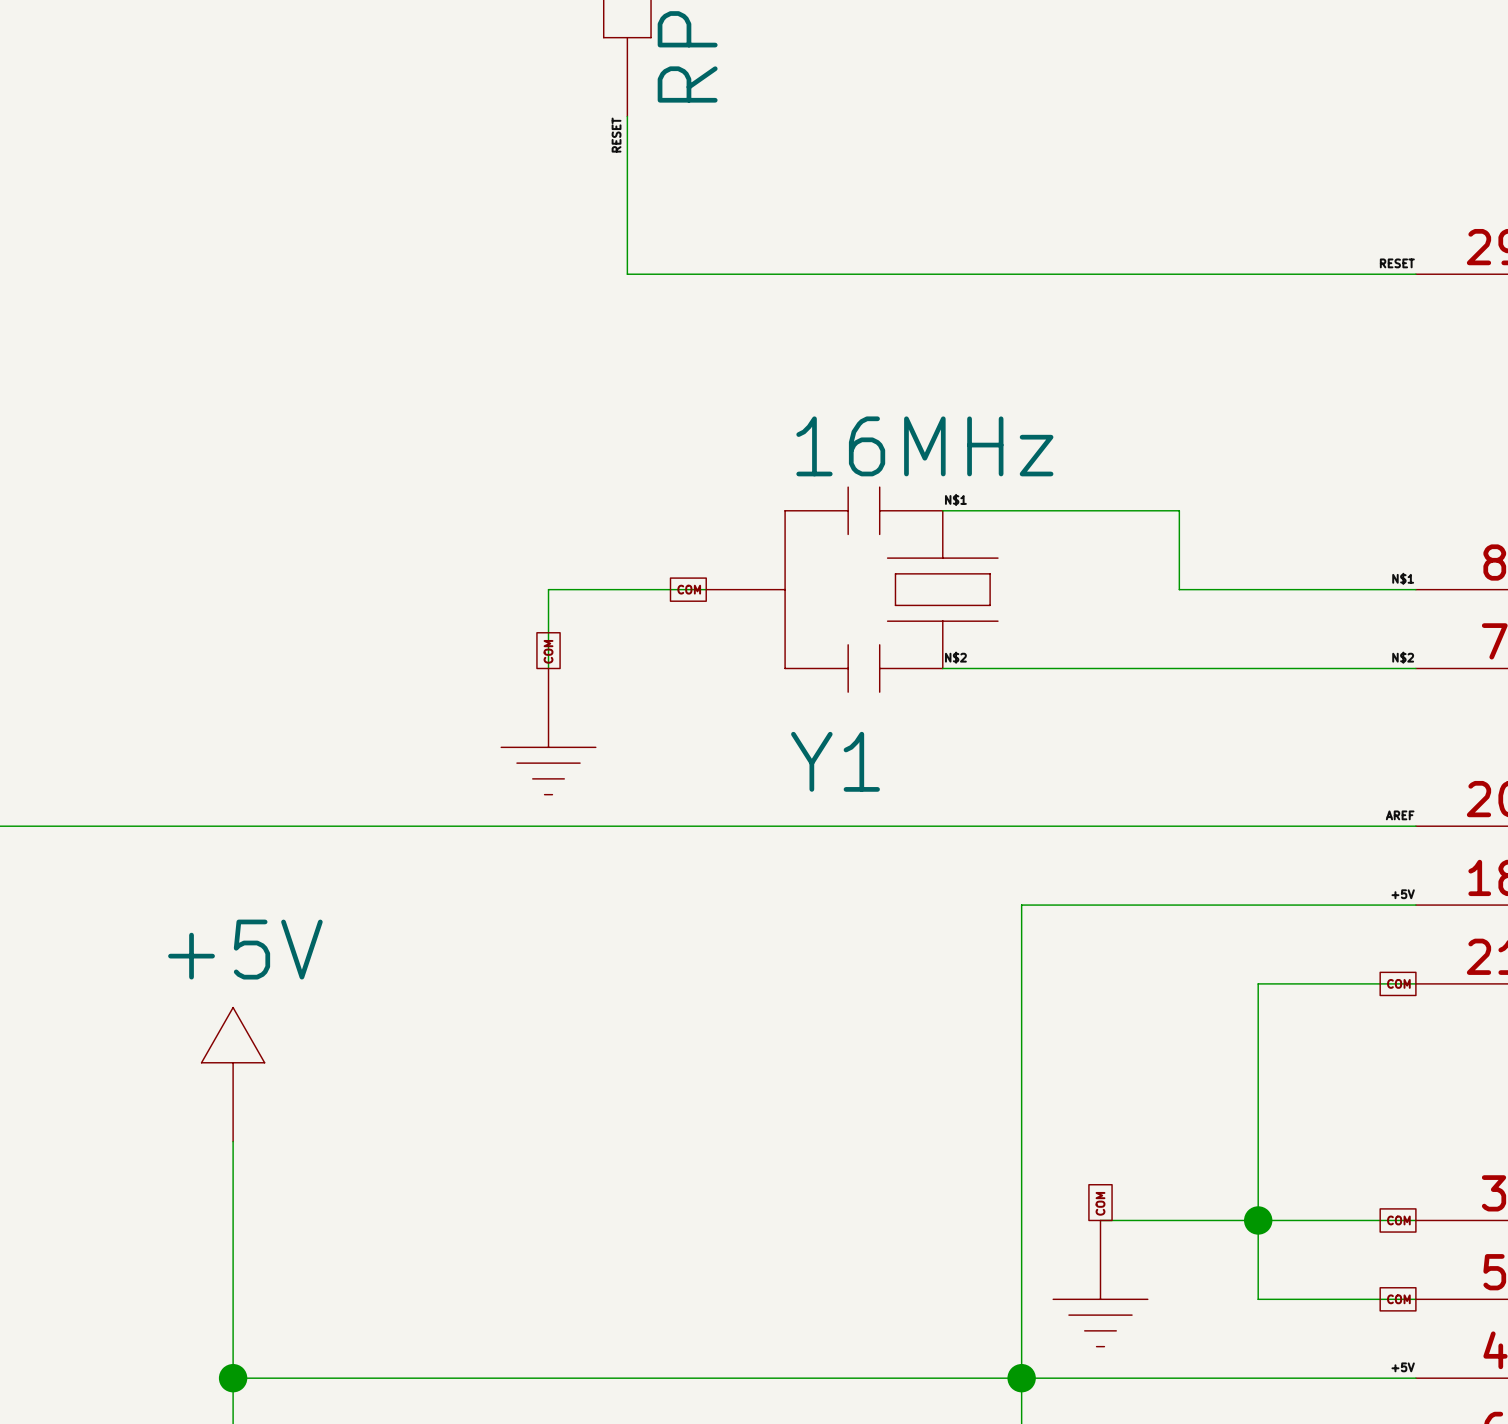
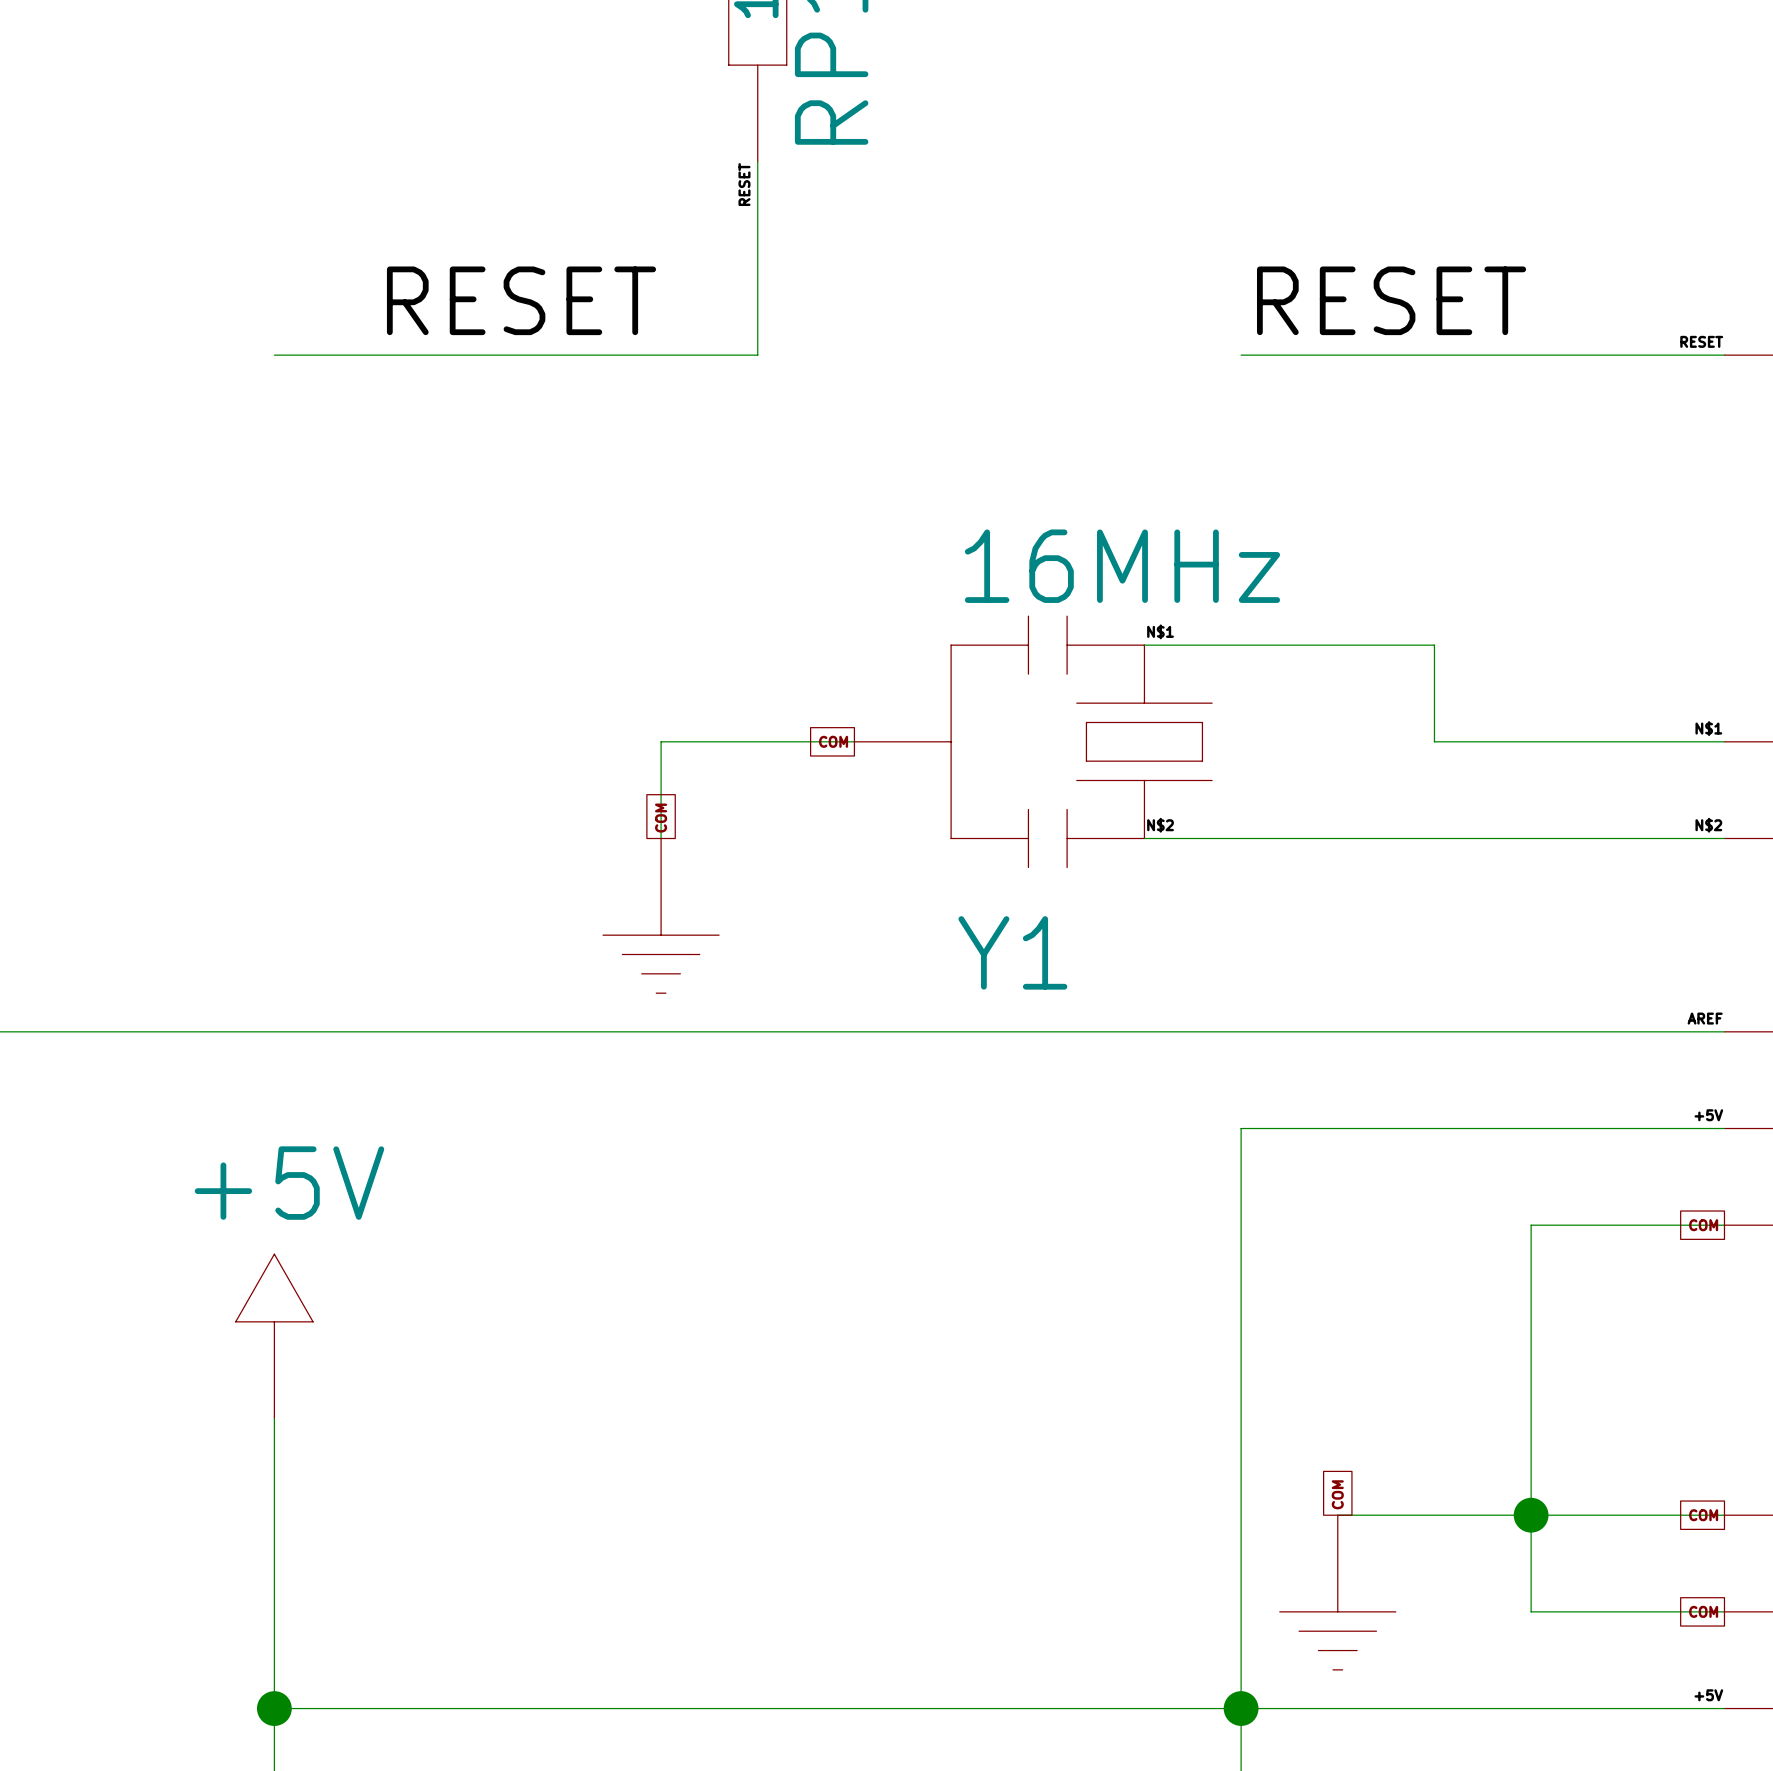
label: none -> RESET (521, 300)
label: none -> RESET (1391, 300)
wire: (627, 274) (1021, 274) -> (757, 355) (274, 355)

